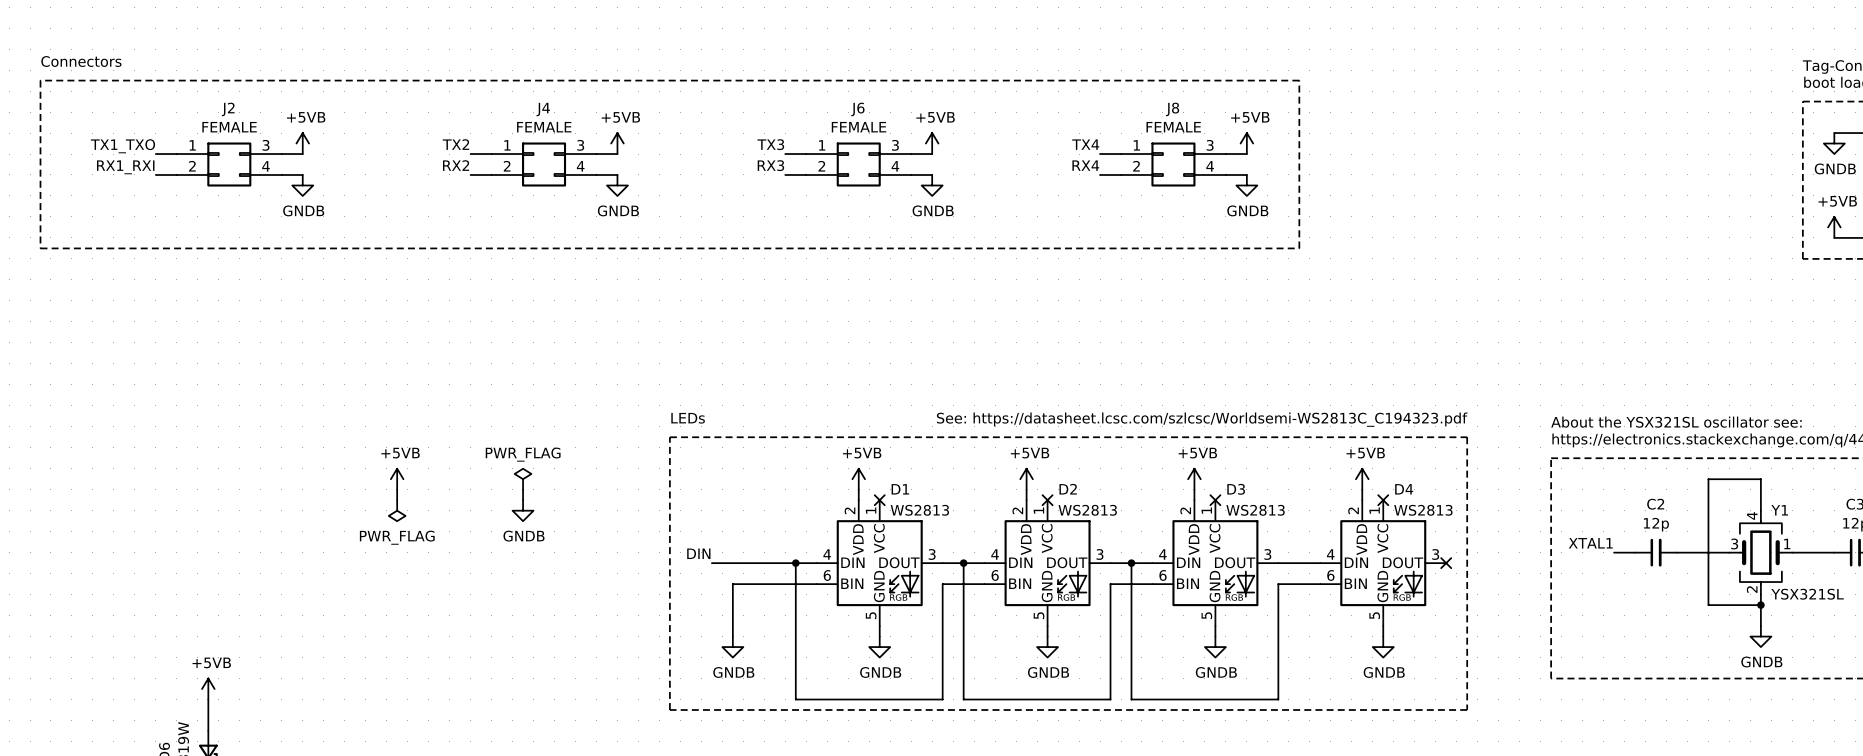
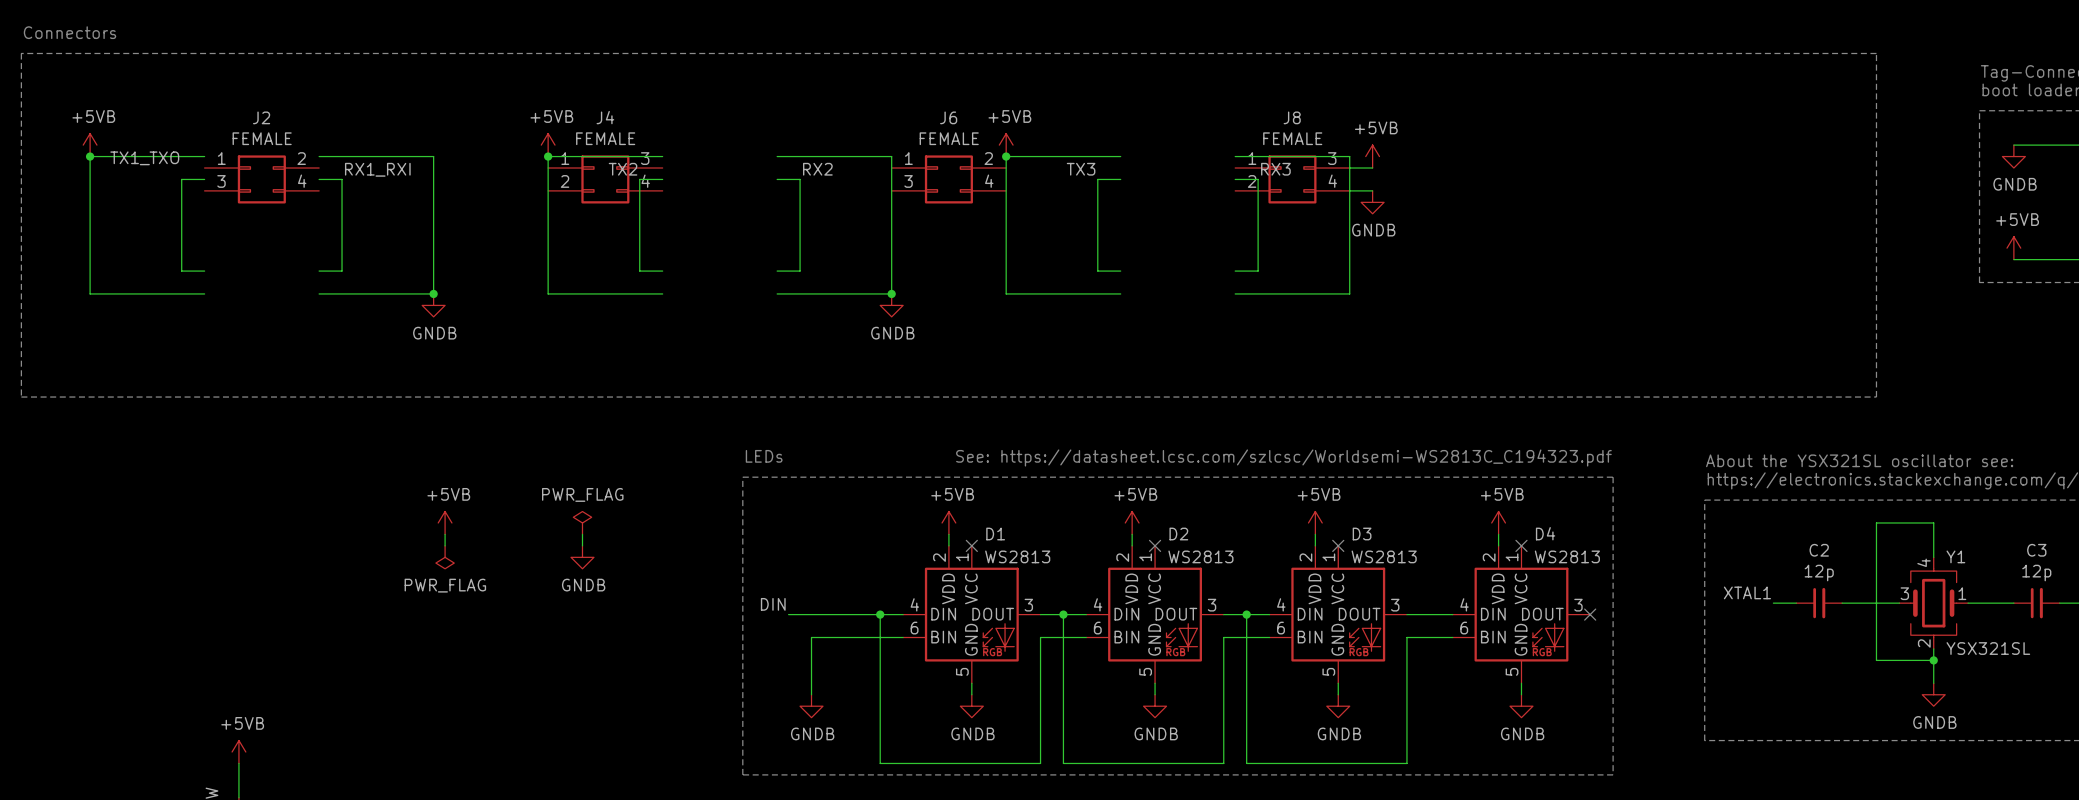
line: none -> (21, 53) (1876, 53) (1876, 397) (21, 397) (21, 53)
text position: Connectors (81, 61) -> Connectors (70, 32)
line: (40, 80) (1299, 80) (1299, 248) (40, 248) (40, 80) -> none
power symbol: none -> +5VB (90, 145)
power symbol: none -> +5VB (548, 145)
junction: none -> (90, 156)
wire: none -> (204, 156) (90, 156) (90, 293) (204, 293)
wire: none -> (319, 156) (433, 156) (433, 293) (319, 293)
power symbol: +5VB (302, 143) -> none
junction: none -> (548, 156)
wire: none -> (662, 156) (548, 156) (548, 293) (662, 293)
power symbol: +5VB (617, 143) -> none
wire: none -> (777, 156) (891, 156) (891, 293) (777, 293)
junction: none -> (1006, 156)
power symbol position: +5VB (932, 143) -> +5VB (1006, 145)
wire: none -> (1120, 156) (1006, 156) (1006, 293) (1120, 293)
wire: none -> (1235, 156) (1349, 156) (1349, 293) (1235, 293)
label position: TX2 (455, 144) -> TX2 (623, 169)
label: TX3 (770, 144) -> none
label: TX4 (1085, 144) -> none
J2 pin number: 3 (266, 145) -> 2 (301, 158)
J6 pin number: 3 (895, 145) -> 2 (988, 158)
wire: (155, 154) (176, 154) -> none
wire: (281, 154) (302, 154) -> none
wire: (470, 154) (491, 154) -> none
wire: (596, 154) (617, 154) -> none
wire: (785, 154) (806, 154) -> none
wire: (911, 154) (932, 154) -> none
wire: (1100, 154) (1121, 154) -> none
label: none -> TX3 (1081, 169)
label: none -> RX3 (1275, 169)
wire: none -> (204, 179) (181, 179) (181, 271) (204, 271)
wire: none -> (319, 179) (342, 179) (342, 271) (319, 271)
wire: none -> (662, 179) (639, 179) (639, 271) (662, 271)
wire: none -> (777, 179) (800, 179) (800, 271) (777, 271)
wire: none -> (1120, 179) (1097, 179) (1097, 271) (1120, 271)
wire: none -> (1235, 179) (1258, 179) (1258, 271) (1235, 271)
label: RX2 (456, 165) -> none
label: RX3 (770, 165) -> RX2 (817, 169)
label: RX4 (1085, 165) -> none
J2 pin number: 2 (192, 166) -> 3 (221, 181)
J6 pin number: 2 (821, 166) -> 3 (908, 181)
label position: RX1_RXI (125, 167) -> RX1_RXI (377, 169)
wire: (155, 174) (176, 174) -> none
wire: (281, 174) (302, 174) -> none
wire: (470, 174) (491, 174) -> none
wire: (596, 174) (617, 174) -> none
wire: (785, 174) (806, 174) -> none
wire: (911, 174) (932, 174) -> none
wire: (1100, 174) (1121, 174) -> none
power symbol: GNDB (302, 185) -> none
power symbol: GNDB (617, 185) -> none
power symbol: GNDB (932, 185) -> none
junction: none -> (433, 293)
junction: none -> (891, 293)
power symbol: none -> GNDB (433, 305)
power symbol: none -> GNDB (891, 305)

